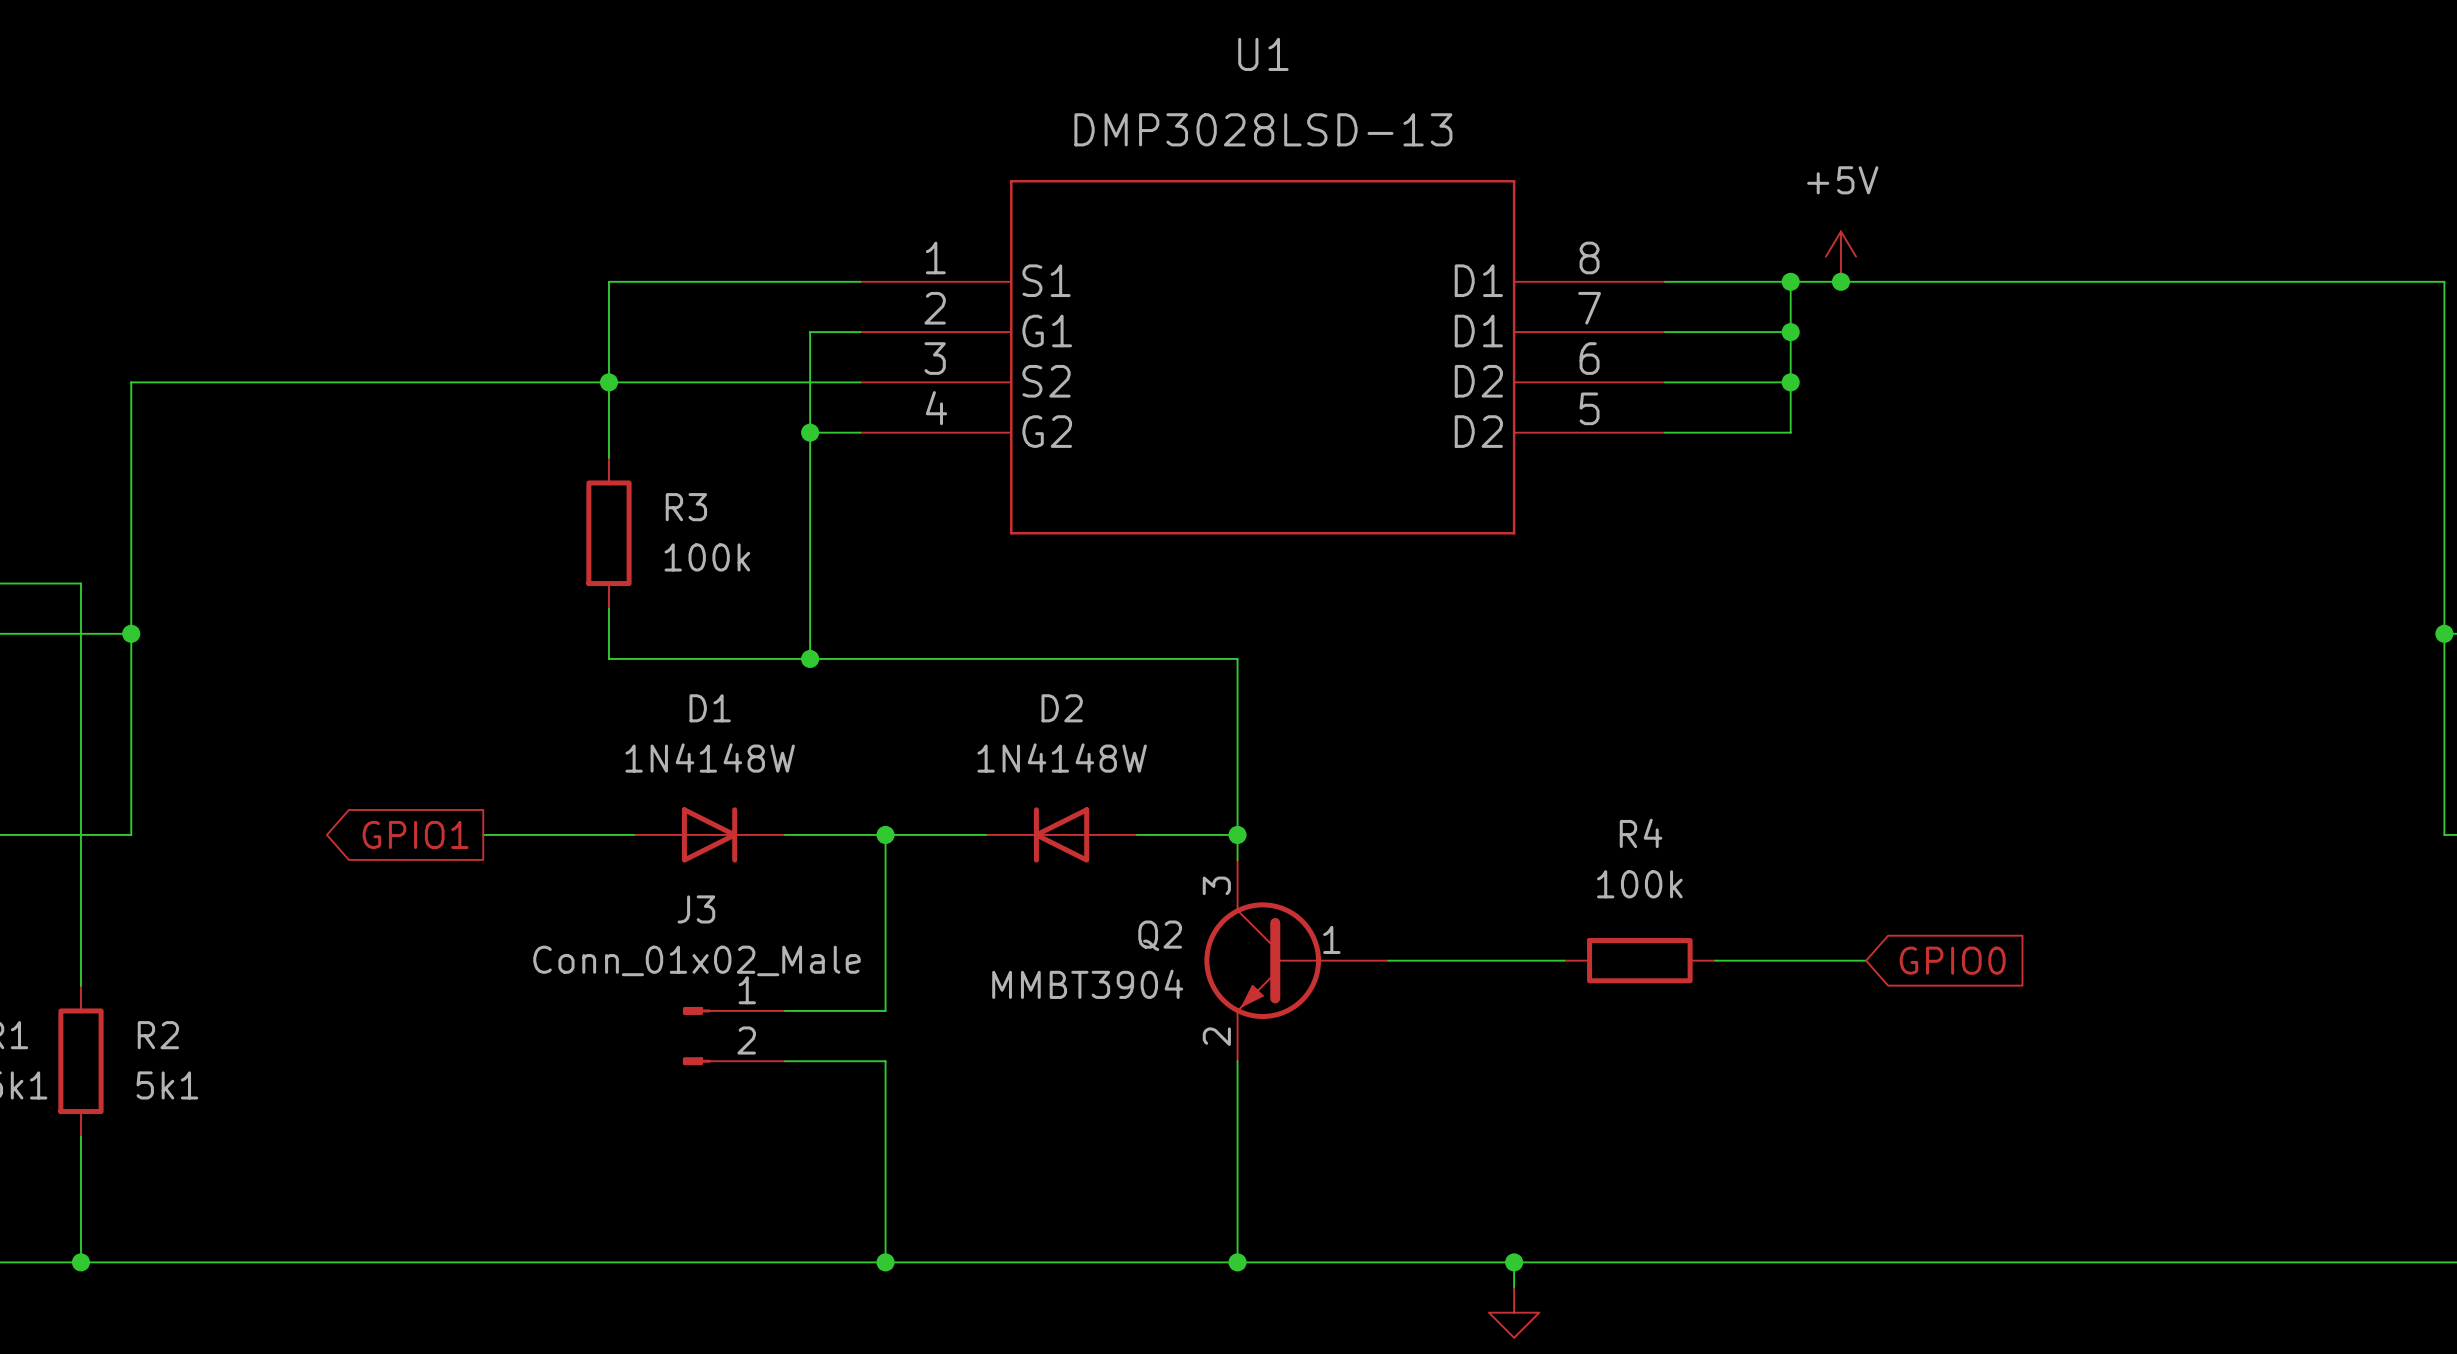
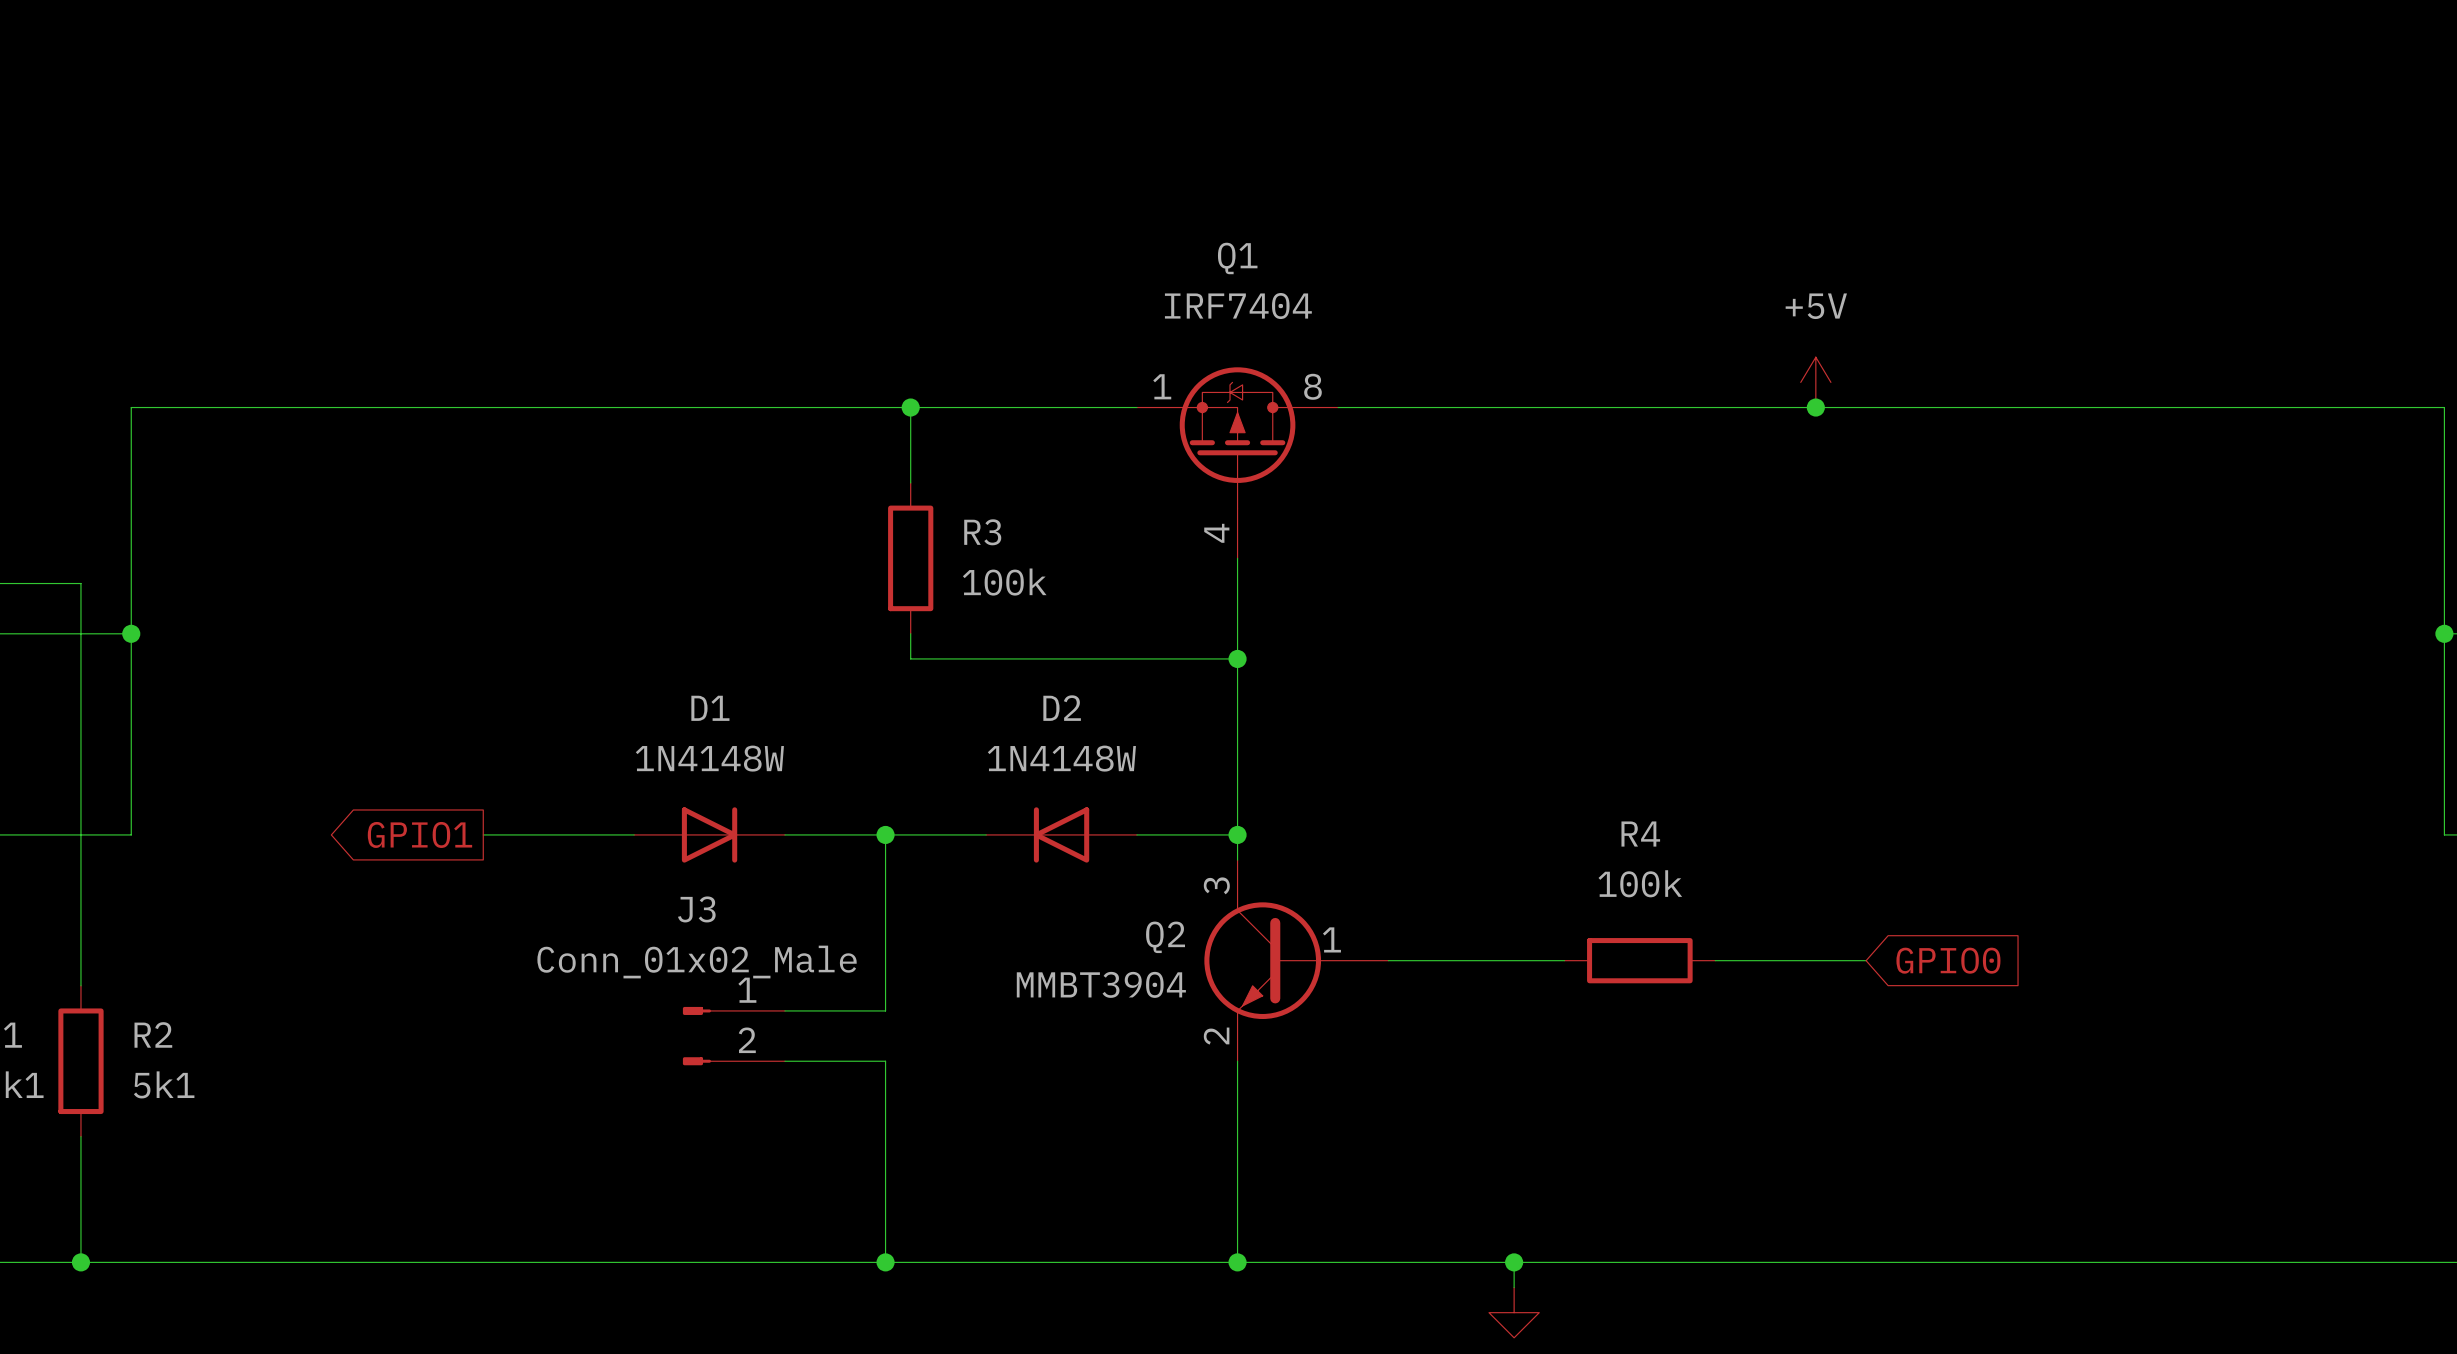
power symbol position: +5V (1840, 256) -> +5V (1815, 382)
wire: (860, 281) (608, 281) (608, 457) -> none
wire: (1664, 281) (2444, 281) (2444, 407) -> (1338, 407) (2444, 407)
wire: (1790, 281) (1790, 432) (1664, 432) -> none
junction: (1790, 281) -> none
junction: (1840, 281) -> none
wire: (860, 332) (810, 332) (810, 658) -> none
wire: (1664, 332) (1790, 332) -> none
junction: (1790, 332) -> none
U1: DMP3028LSD-13 (1262, 357) -> none
junction: (608, 382) -> none
wire: (860, 382) (131, 382) (131, 407) -> (1136, 407) (131, 407)
wire: (1664, 382) (1790, 382) -> none
junction position: (1790, 382) -> (1815, 407)
wire: none -> (910, 407) (910, 482)
wire: (810, 432) (860, 432) -> none
junction position: (810, 432) -> (910, 407)
Q1: none -> IRF7404 (1237, 462)
R3 position: (608, 533) -> (910, 558)
wire: none -> (1237, 558) (1237, 658)
wire: (608, 608) (608, 658) (910, 658) -> (910, 633) (910, 658)
junction: (810, 658) -> none
junction: none -> (1237, 658)

